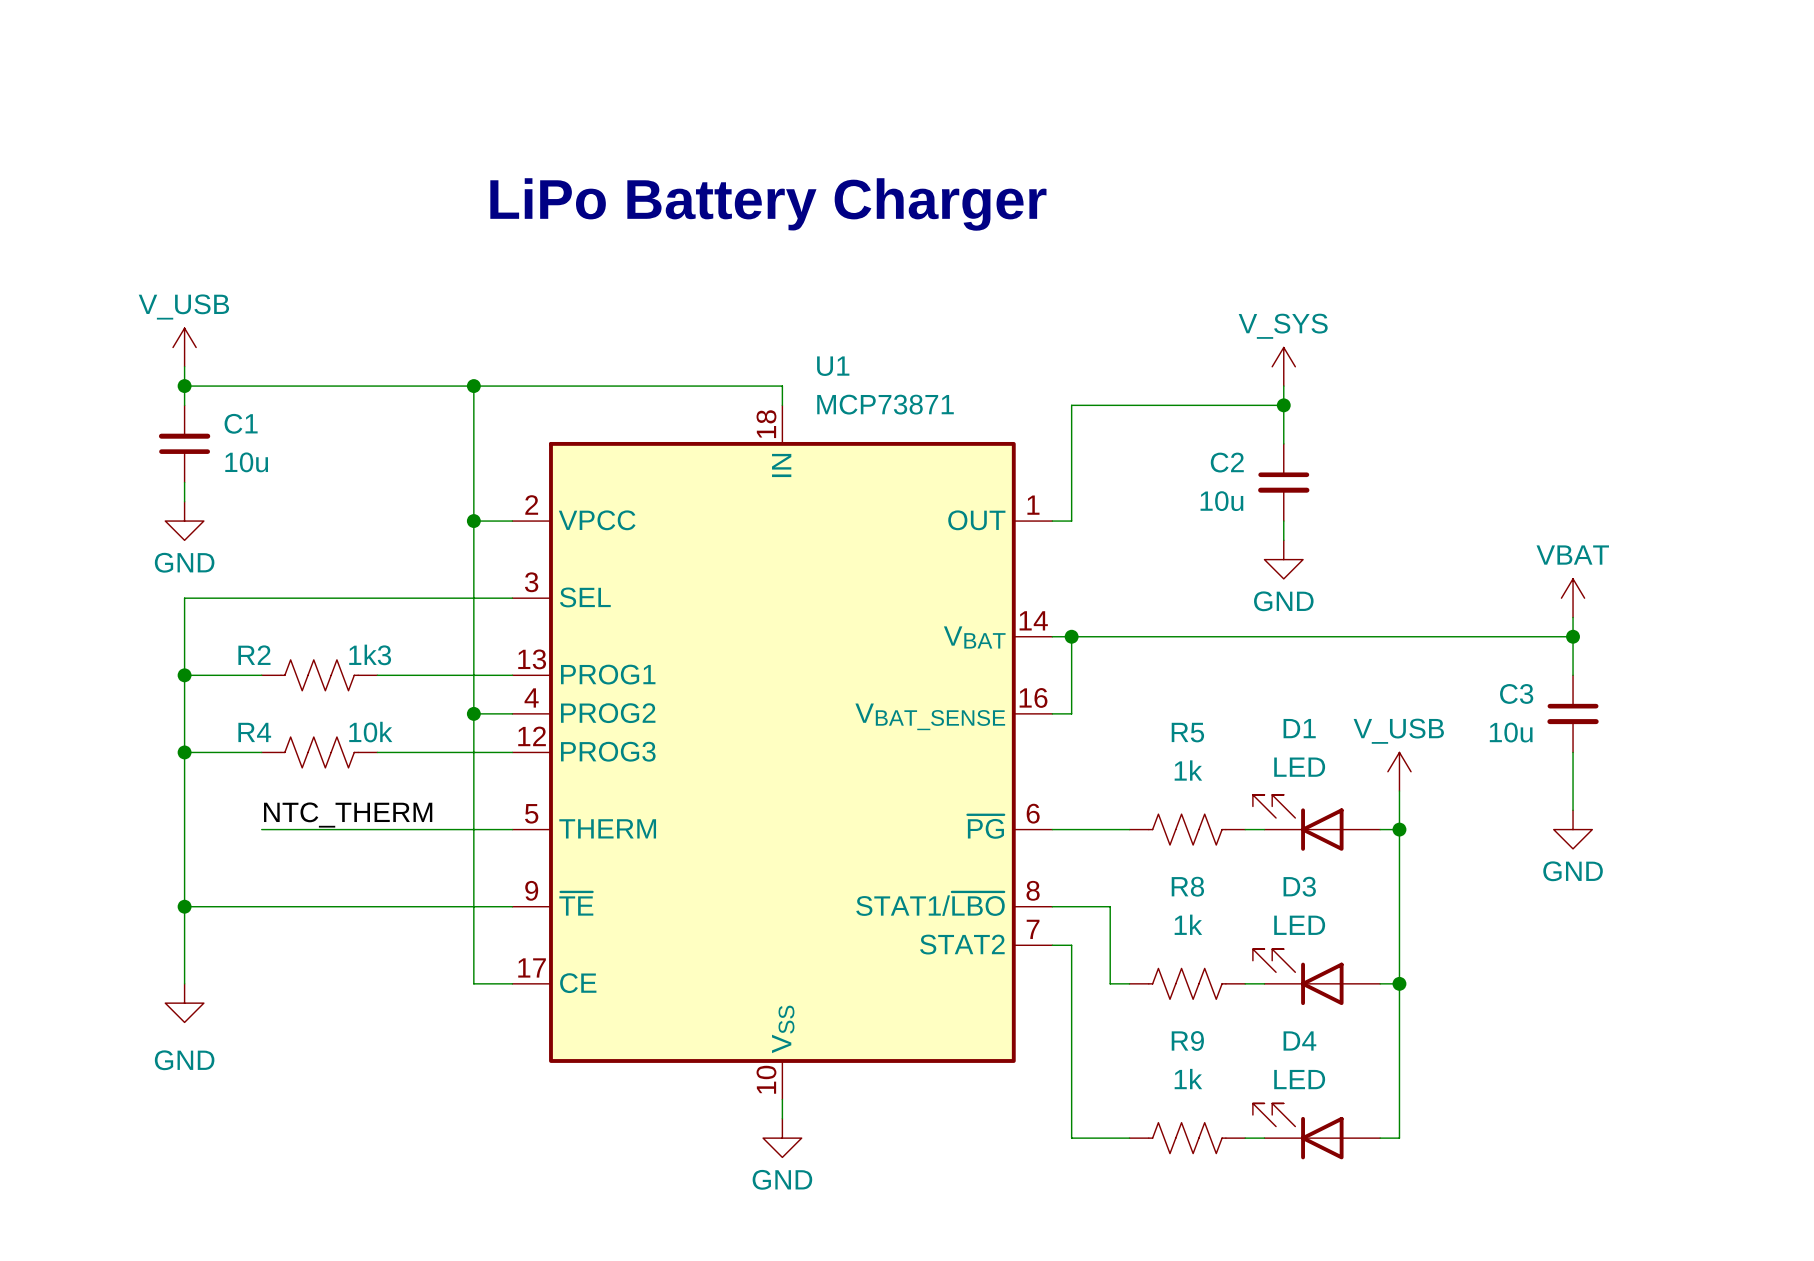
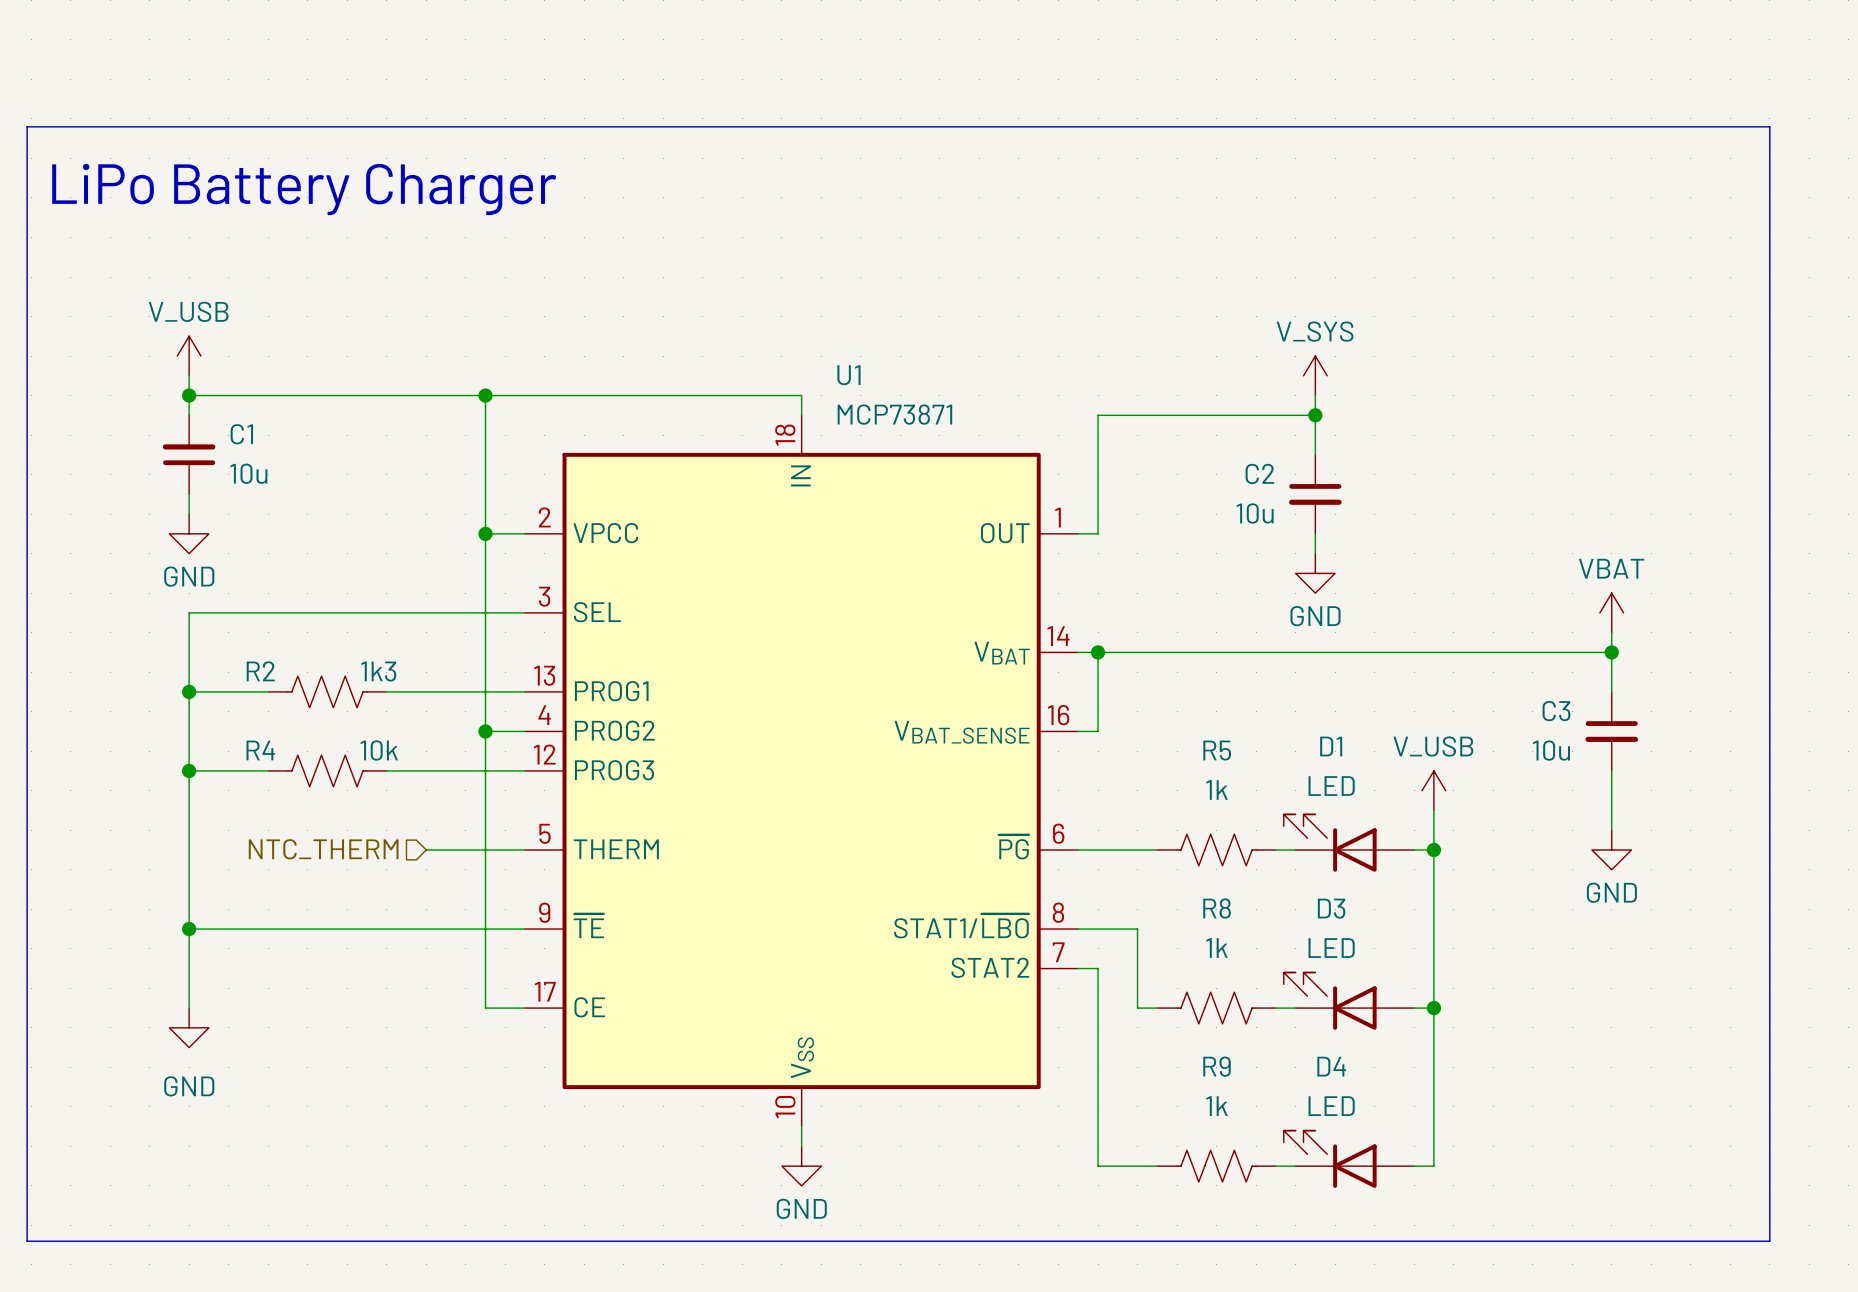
line: none -> (27, 126) (1769, 126) (1769, 1241) (27, 1241) (27, 126)
text: none -> LiPo Battery Charger (304, 189)
text: LiPo Battery Charger (768, 204) -> none
label: NTC_THERM (348, 815) -> none
wire: (261, 829) (415, 829) -> none
hierarchical label: none -> NTC_THERM (323, 849)

